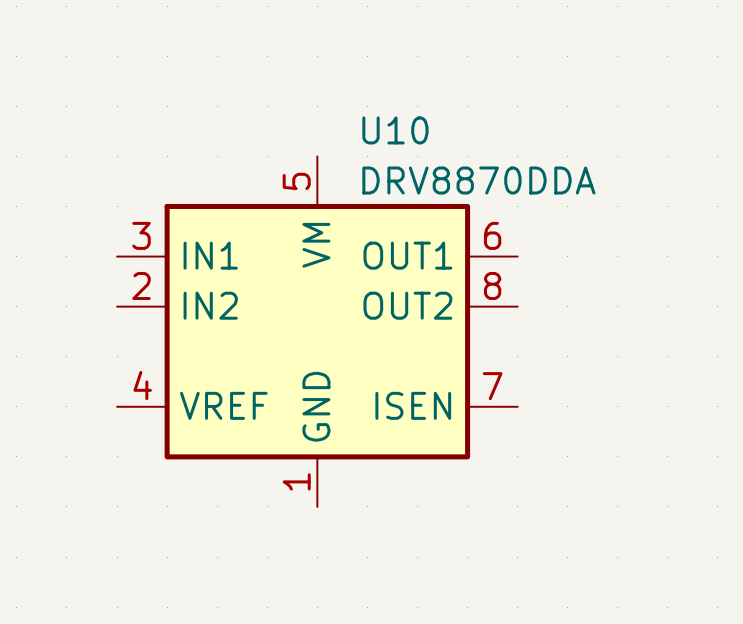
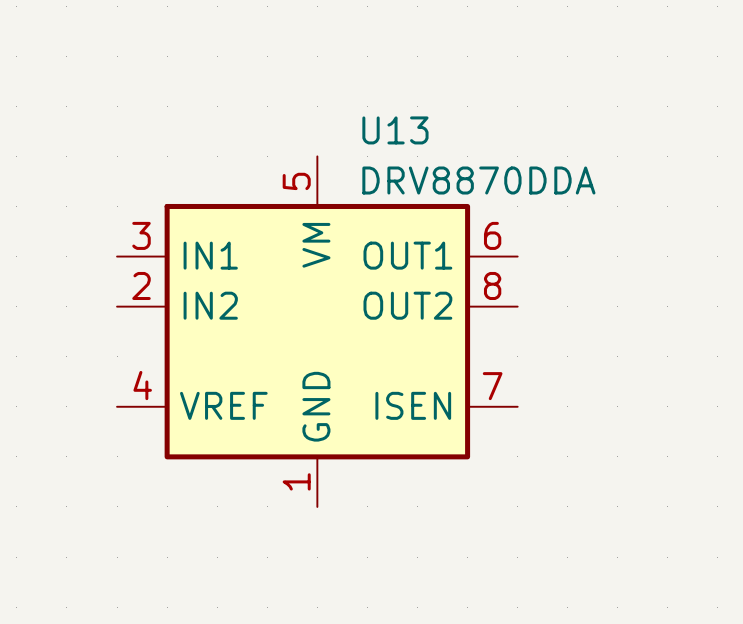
U10 name: U10 (395, 130) -> U13 (395, 130)

